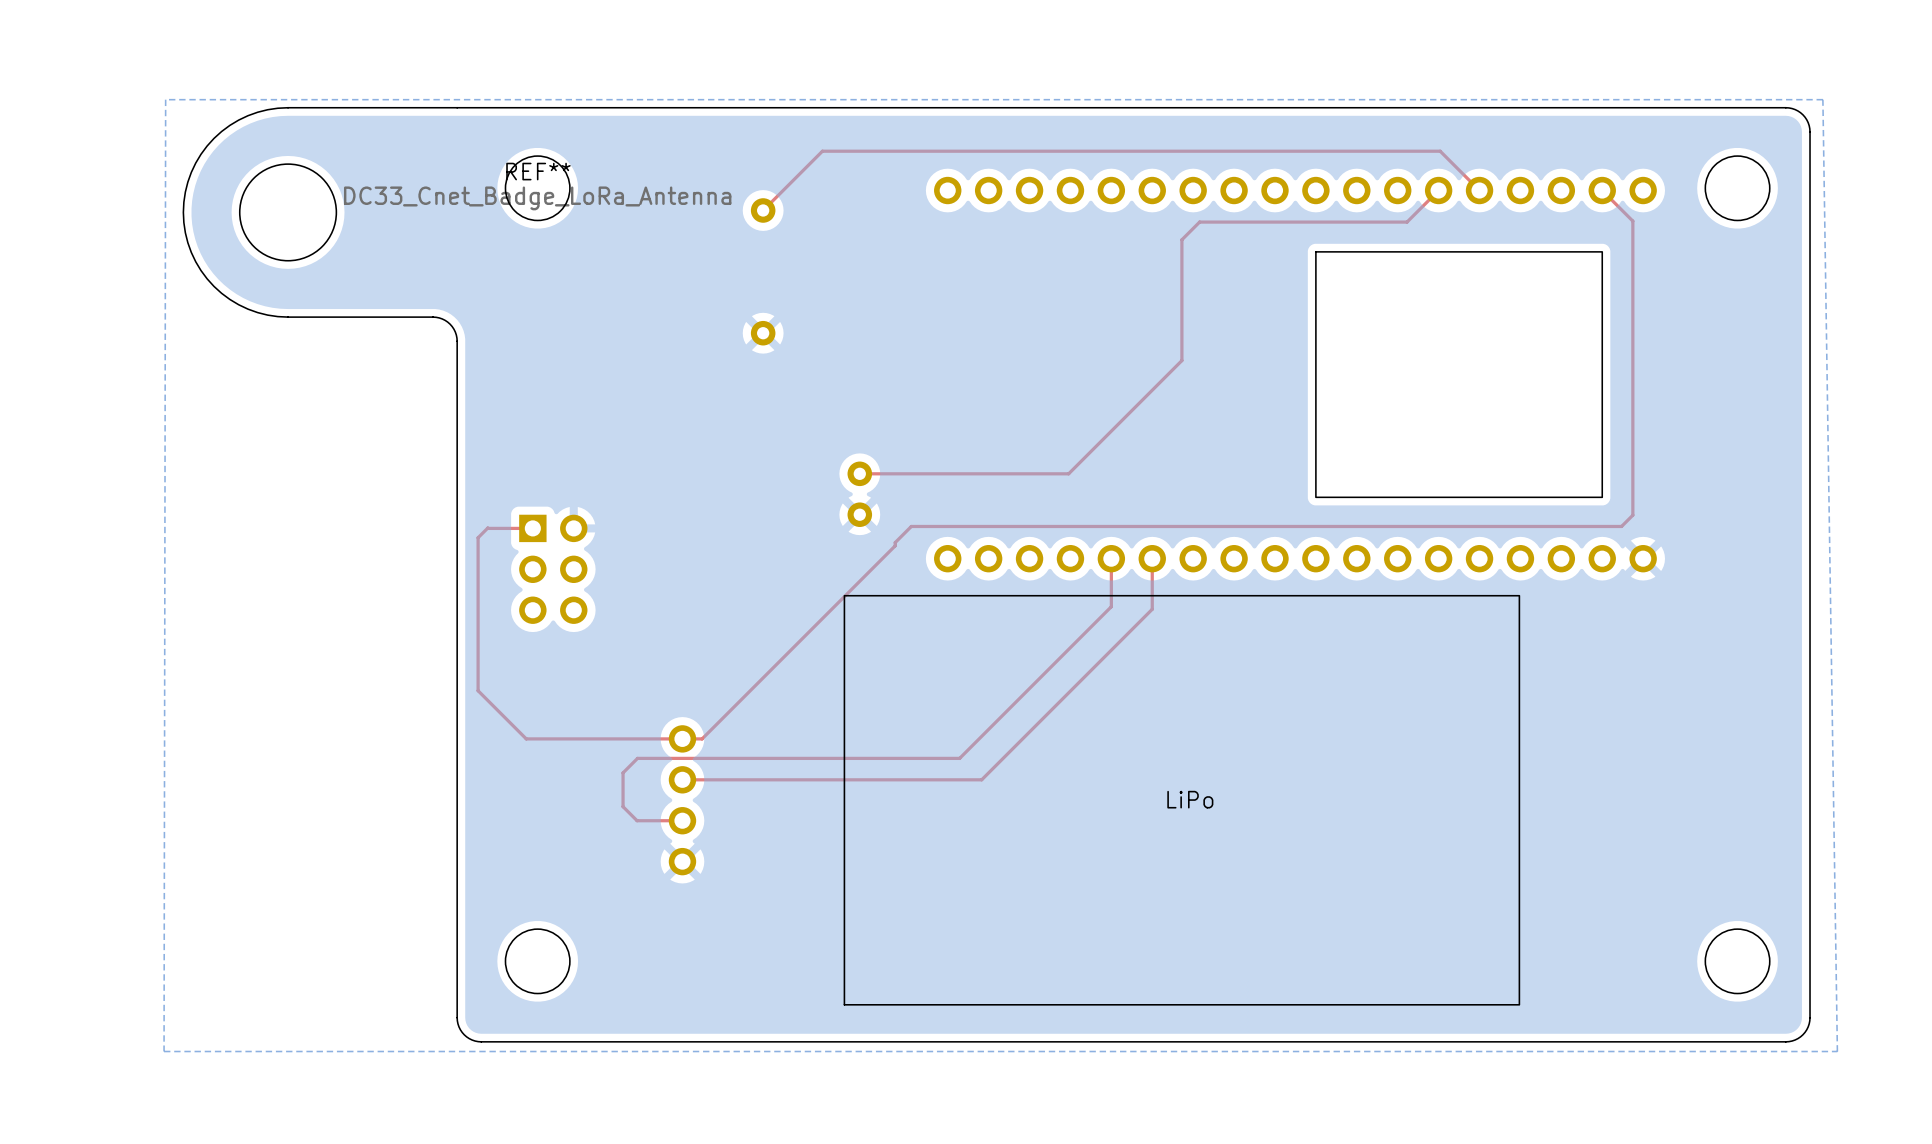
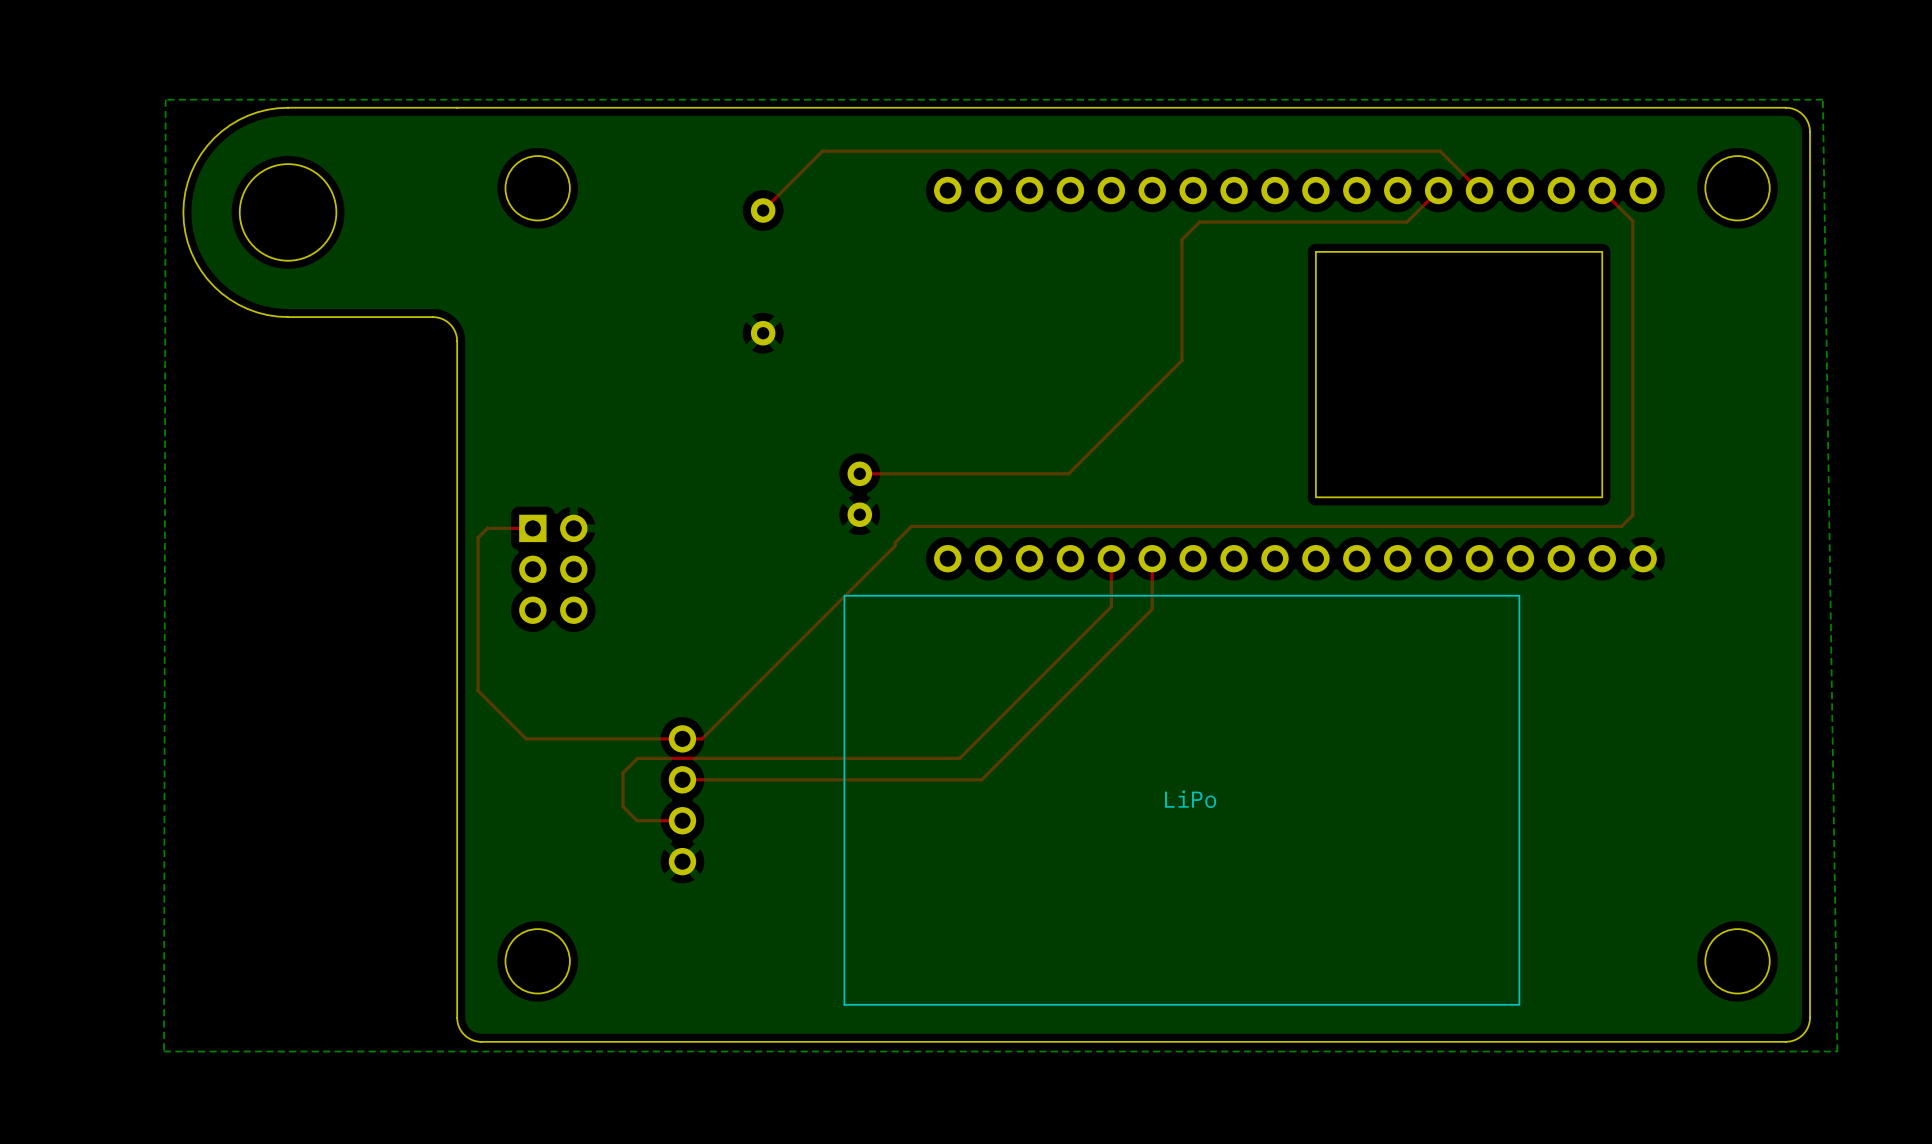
REF**: DC33_Cnet_Badge_LoRa_Antenna (537, 186) -> none

